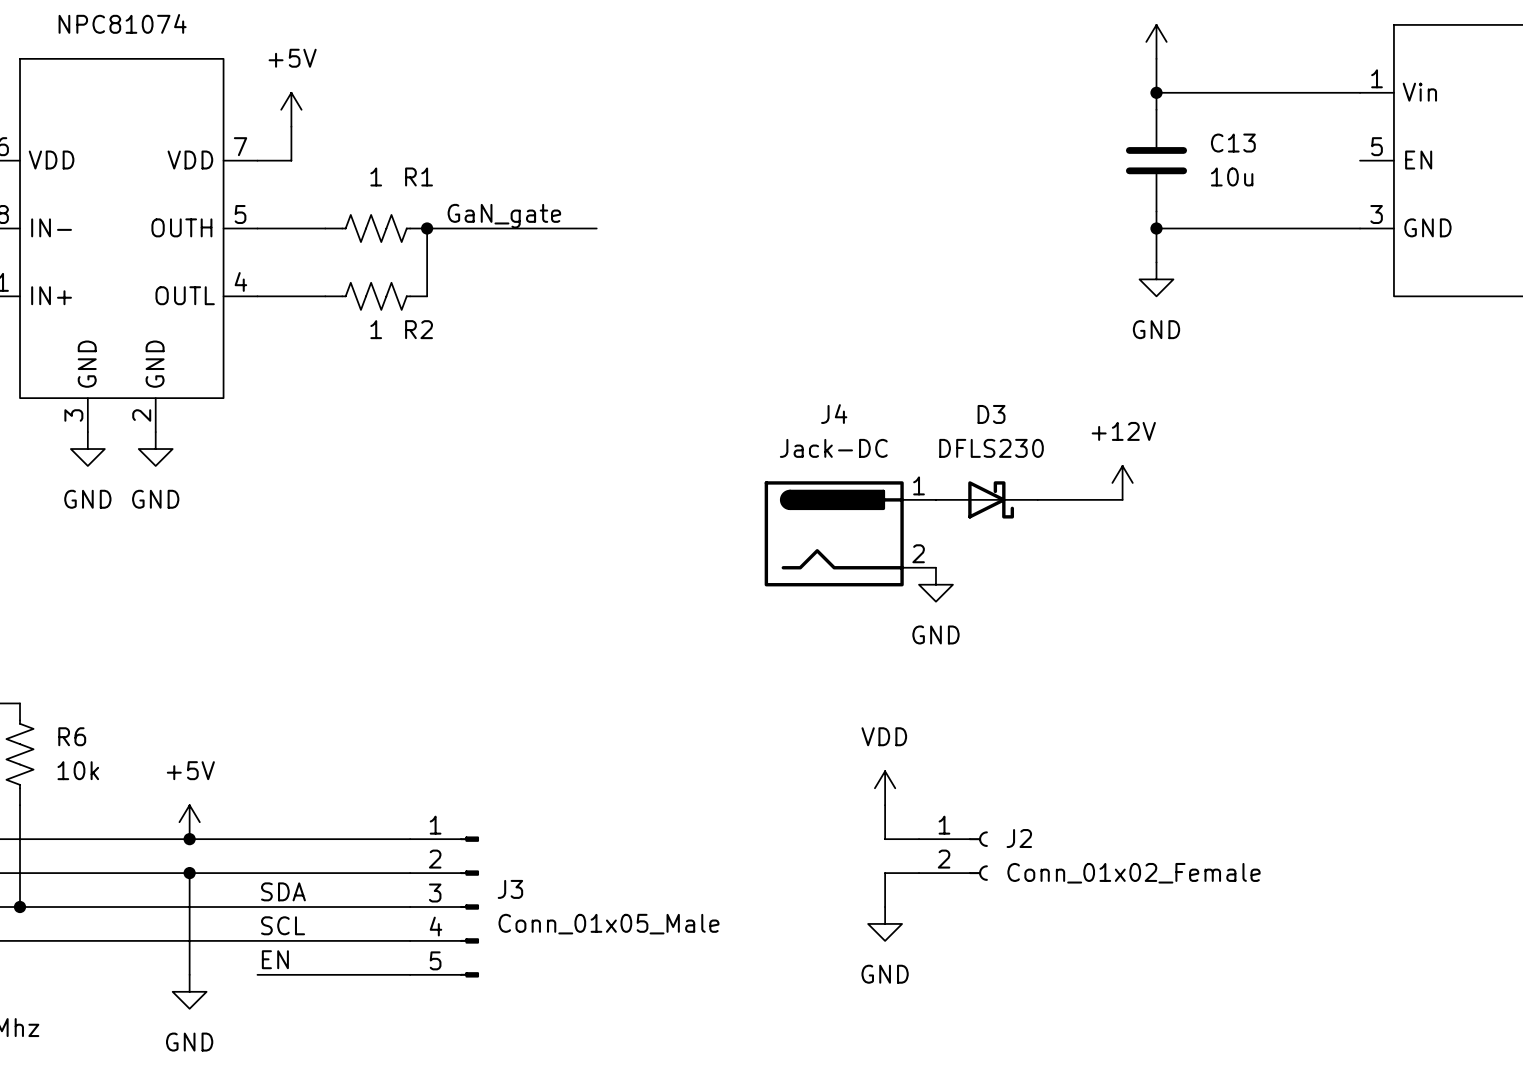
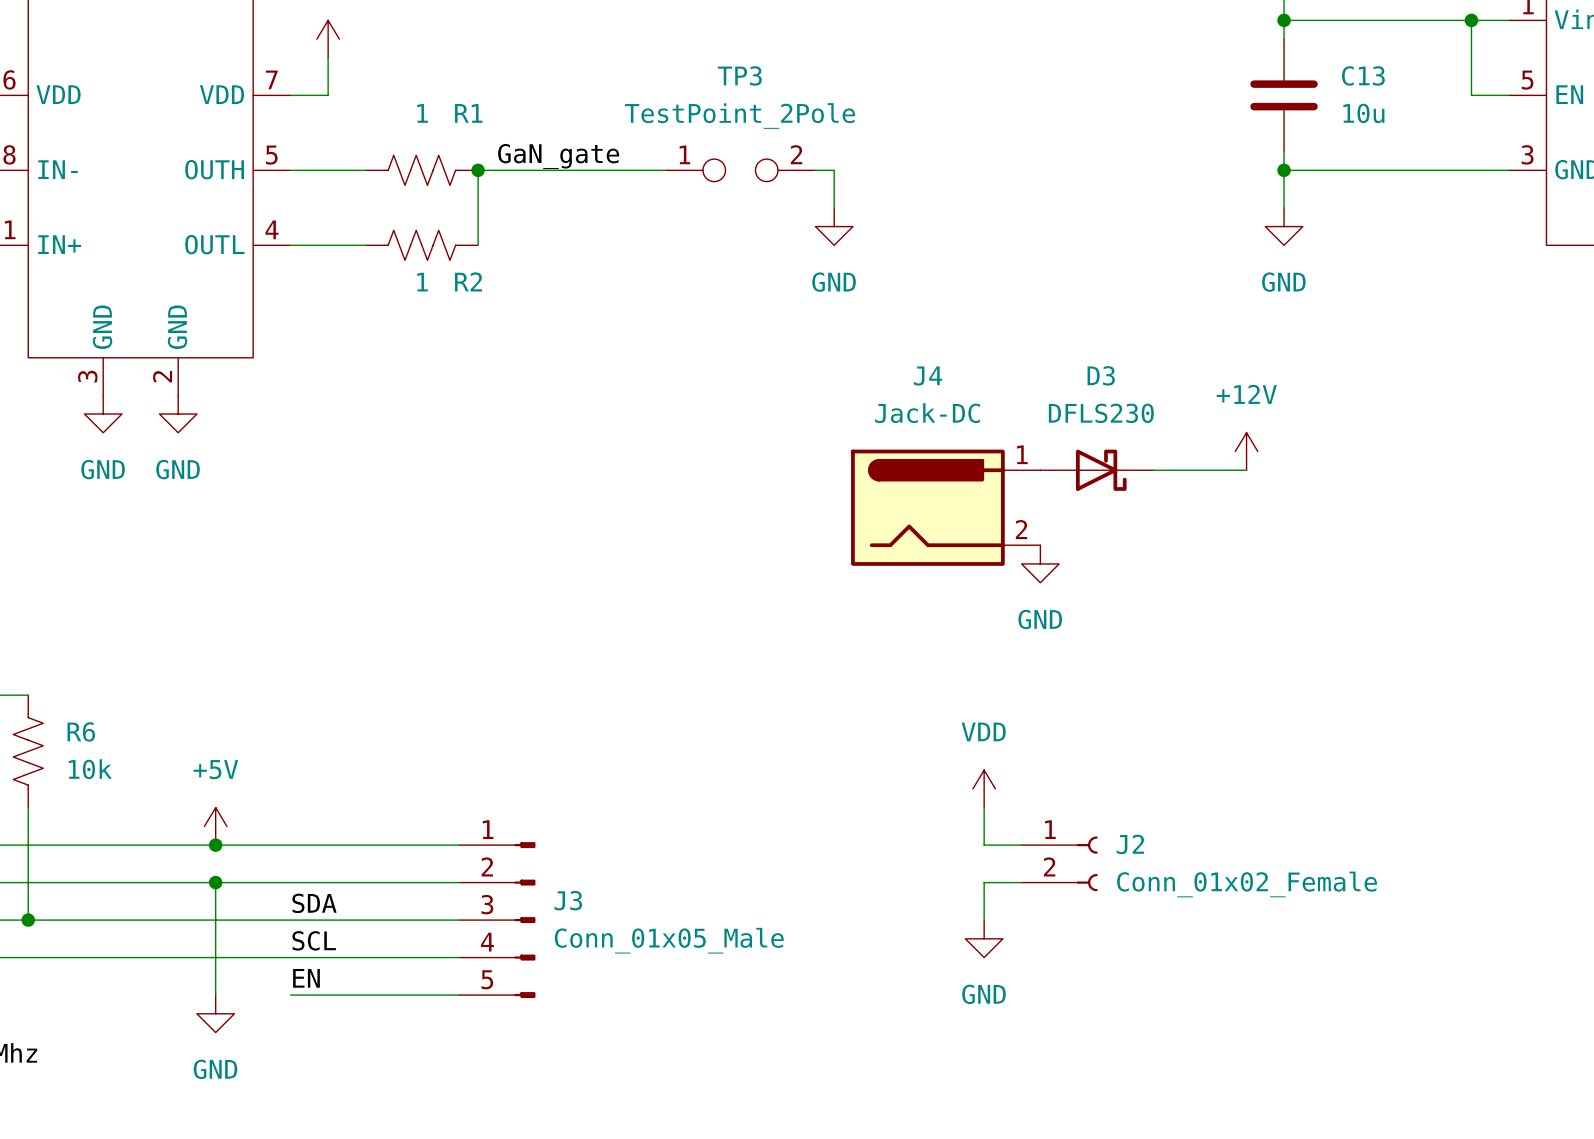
wire: none -> (1471, 20) (1471, 95) (1508, 95)
junction: none -> (1471, 20)
TP3: none -> TestPoint_2Pole (740, 170)
wire: none -> (815, 170) (834, 170) (834, 207)
power symbol: none -> GND (834, 226)

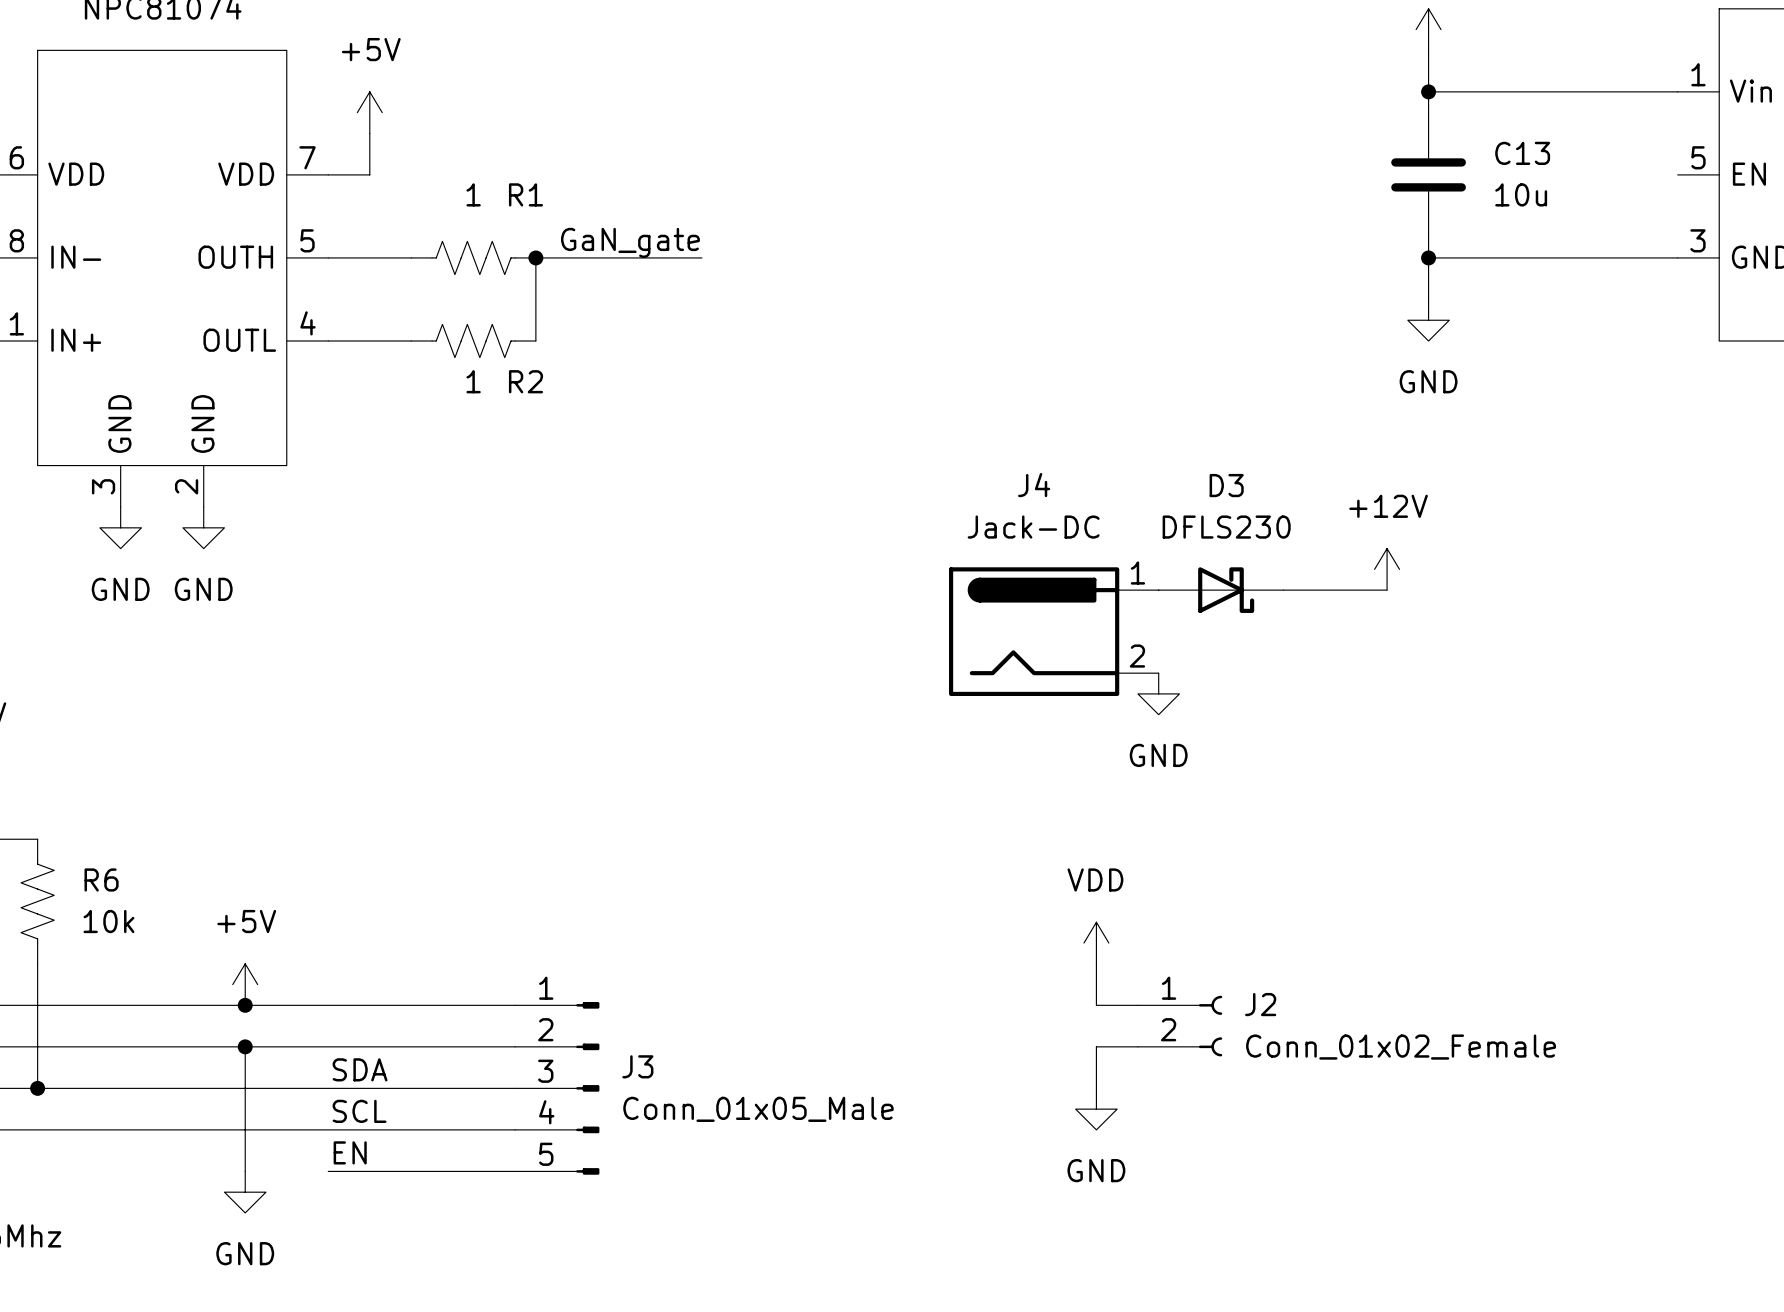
wire: (1471, 20) (1471, 95) (1508, 95) -> none
junction: (1471, 20) -> none
wire: (628, 170) (665, 170) -> none
TP3: TestPoint_2Pole (740, 170) -> none
wire: (815, 170) (834, 170) (834, 207) -> none
power symbol: GND (834, 226) -> none

